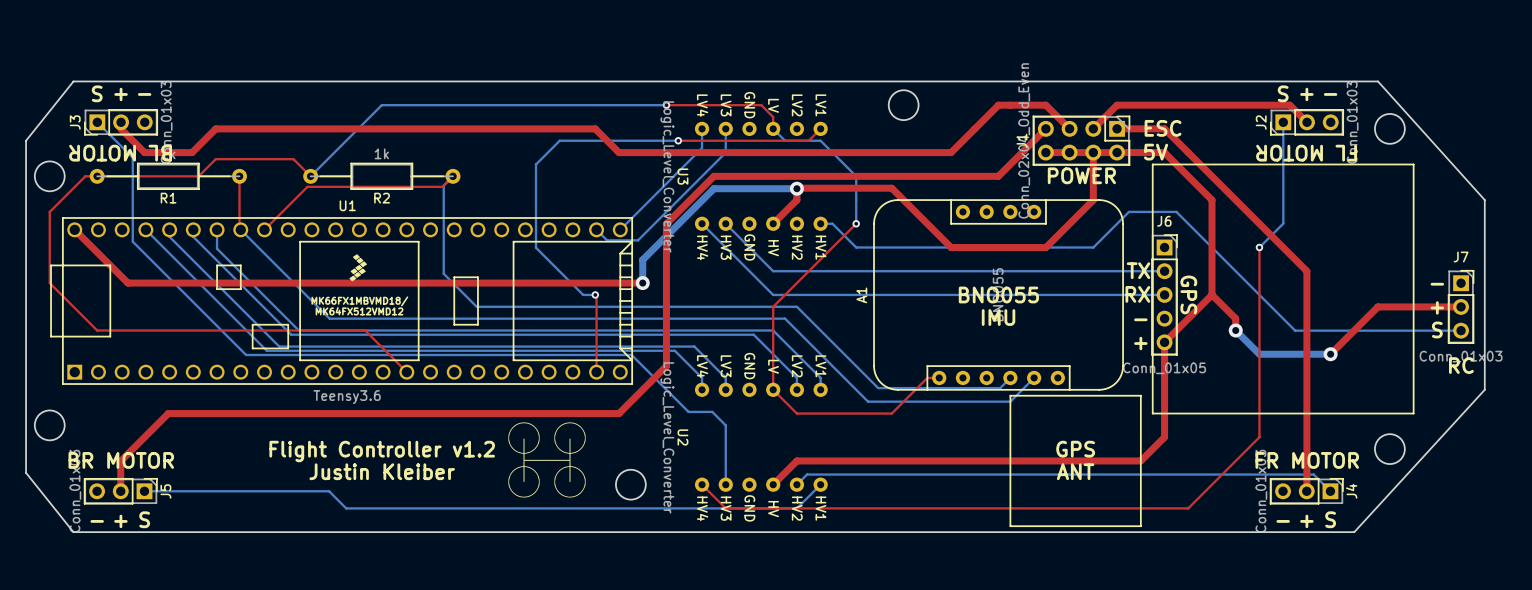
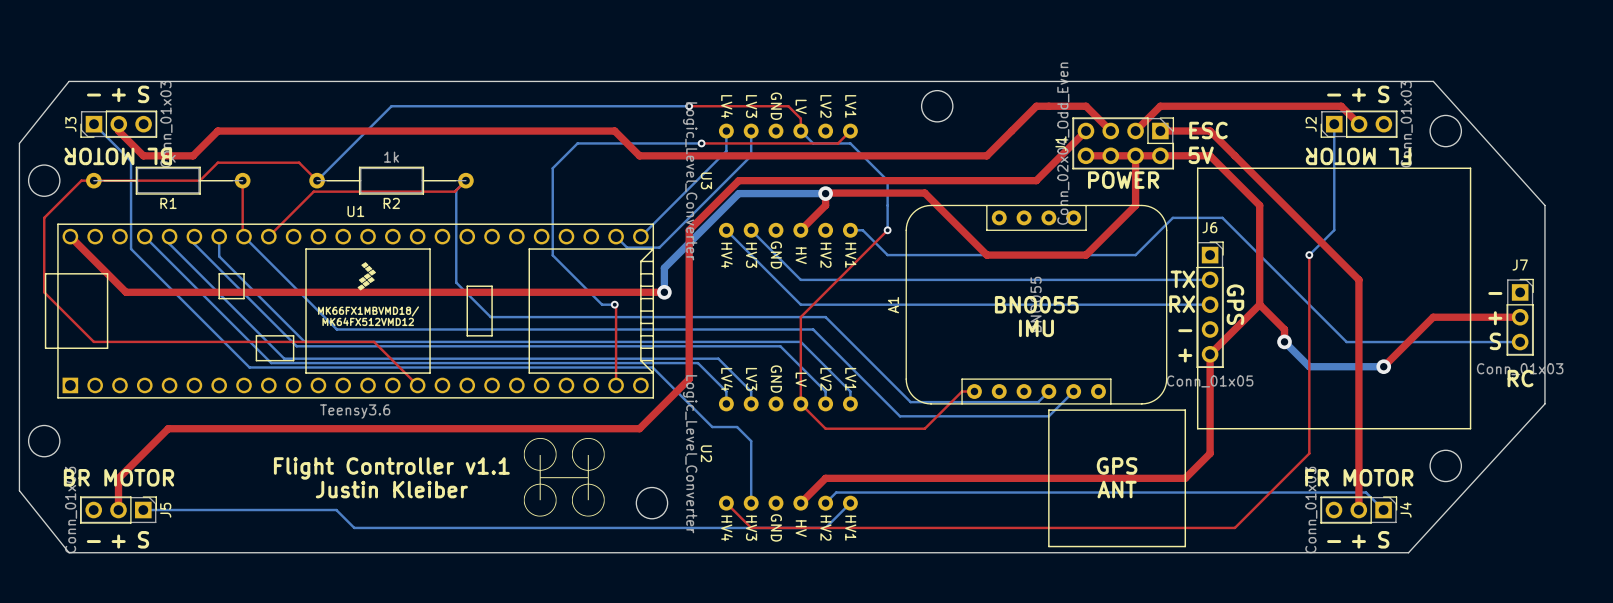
text: S (97, 93) -> - (94, 95)
text: S (1283, 93) -> - (1334, 95)
text: - (144, 94) -> S (143, 94)
text: - (1330, 94) -> S (1383, 94)
text: Flight Controller v1.2 (382, 451) -> Flight Controller v1.1 (391, 468)

